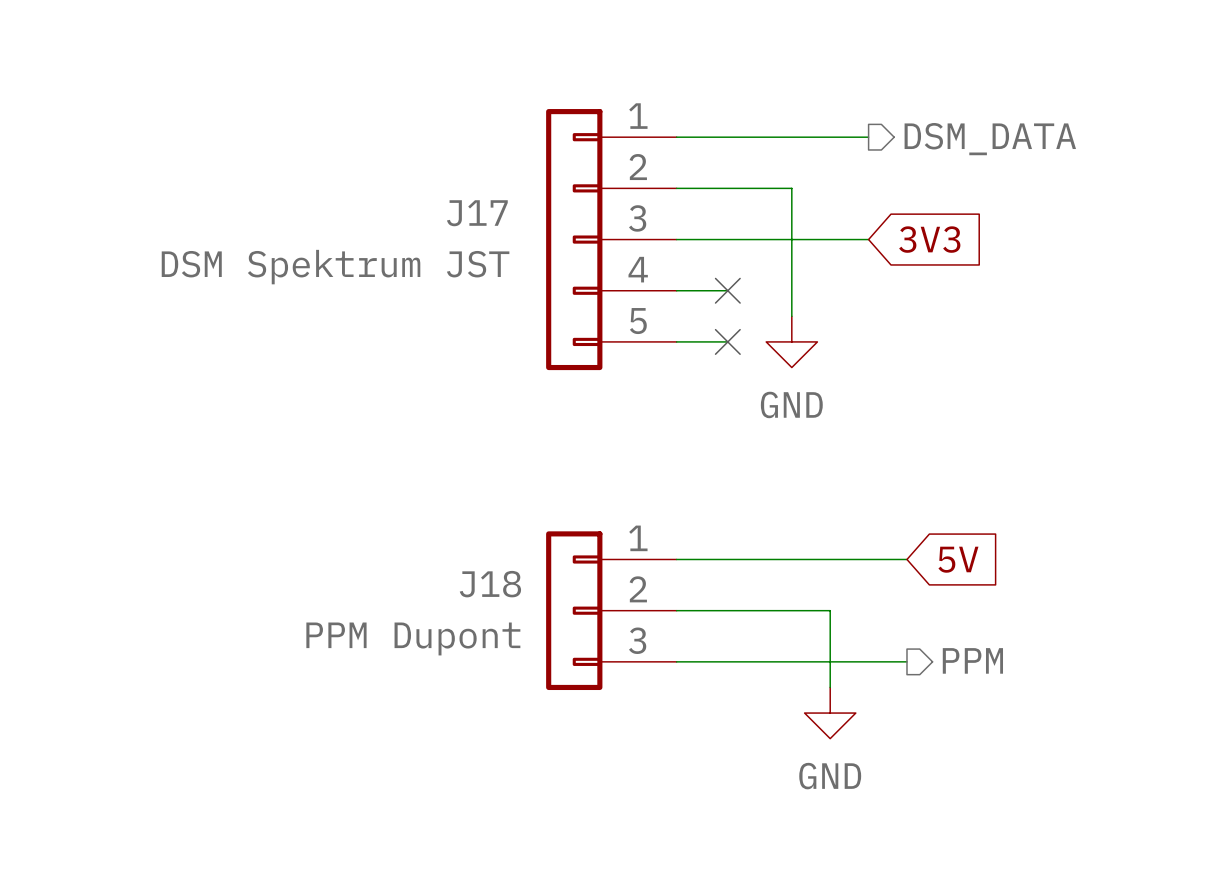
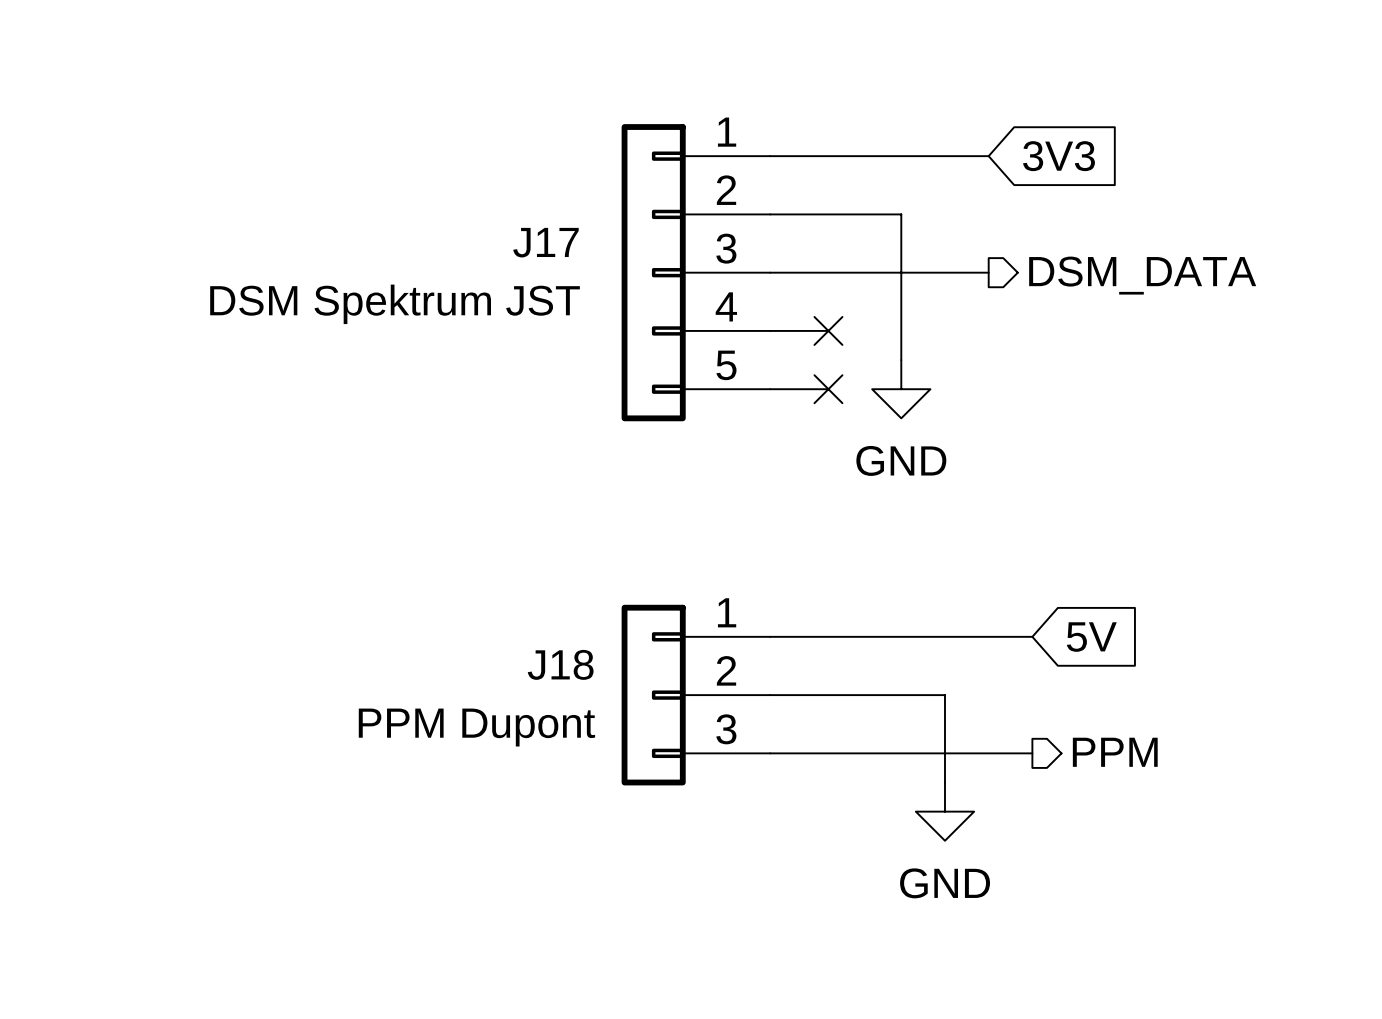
hierarchical label position: DSM_DATA (990, 139) -> DSM_DATA (1142, 275)
global label position: 3V3 (929, 239) -> 3V3 (1059, 156)

